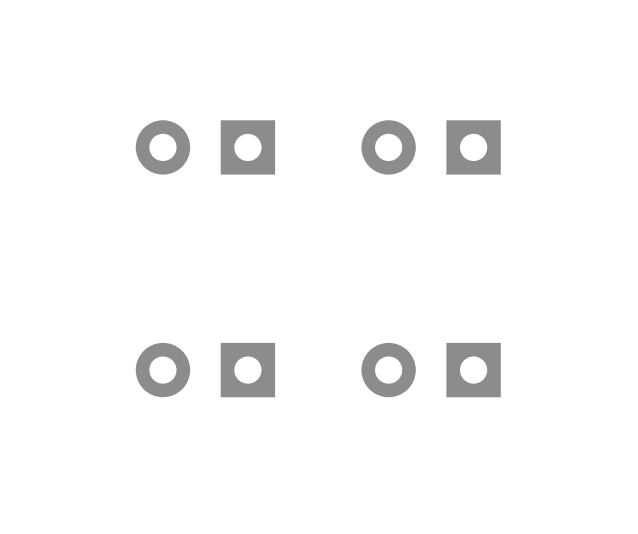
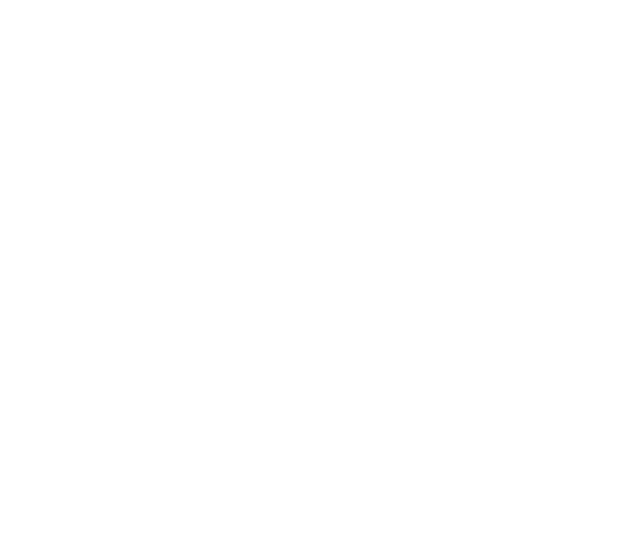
part: (205, 147) -> none
part: (431, 147) -> none
part: (205, 370) -> none
part: (431, 370) -> none

